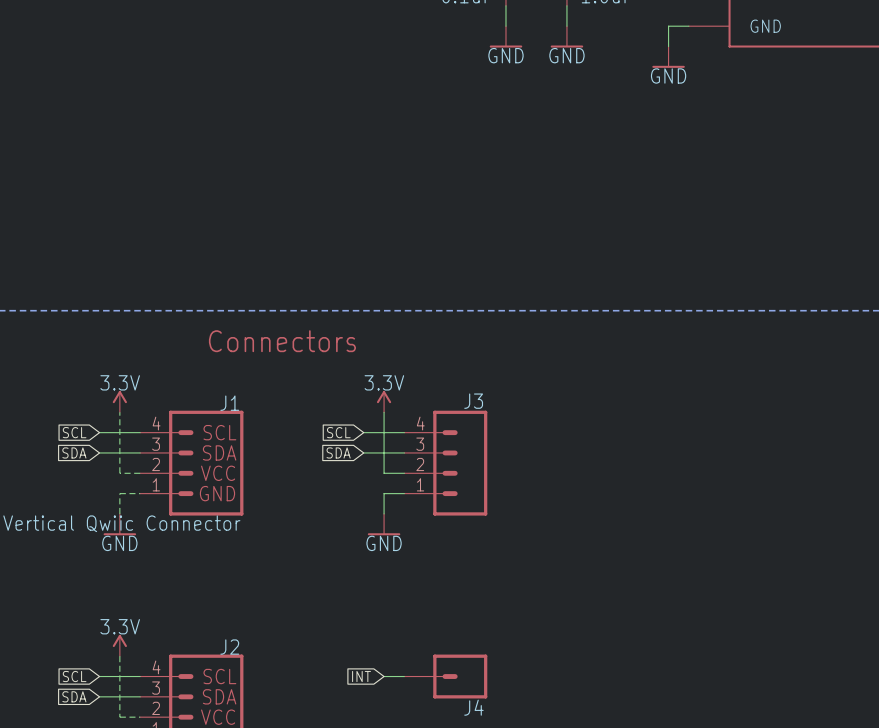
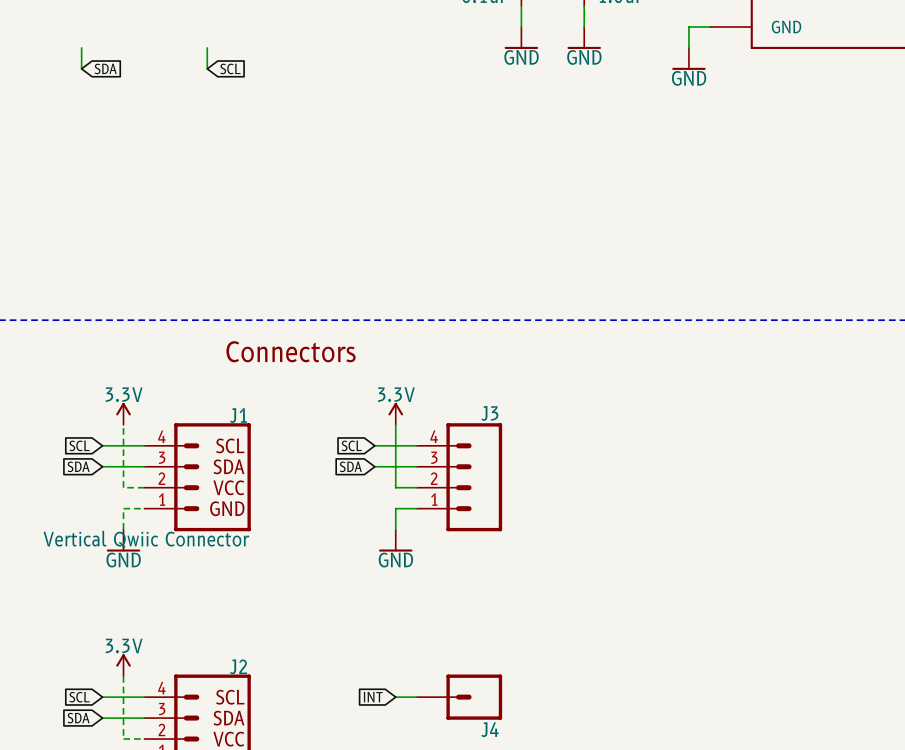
wire: none -> (81, 47) (81, 68)
wire: none -> (207, 47) (207, 68)
global label: none -> SDA (105, 68)
global label: none -> SCL (230, 68)

